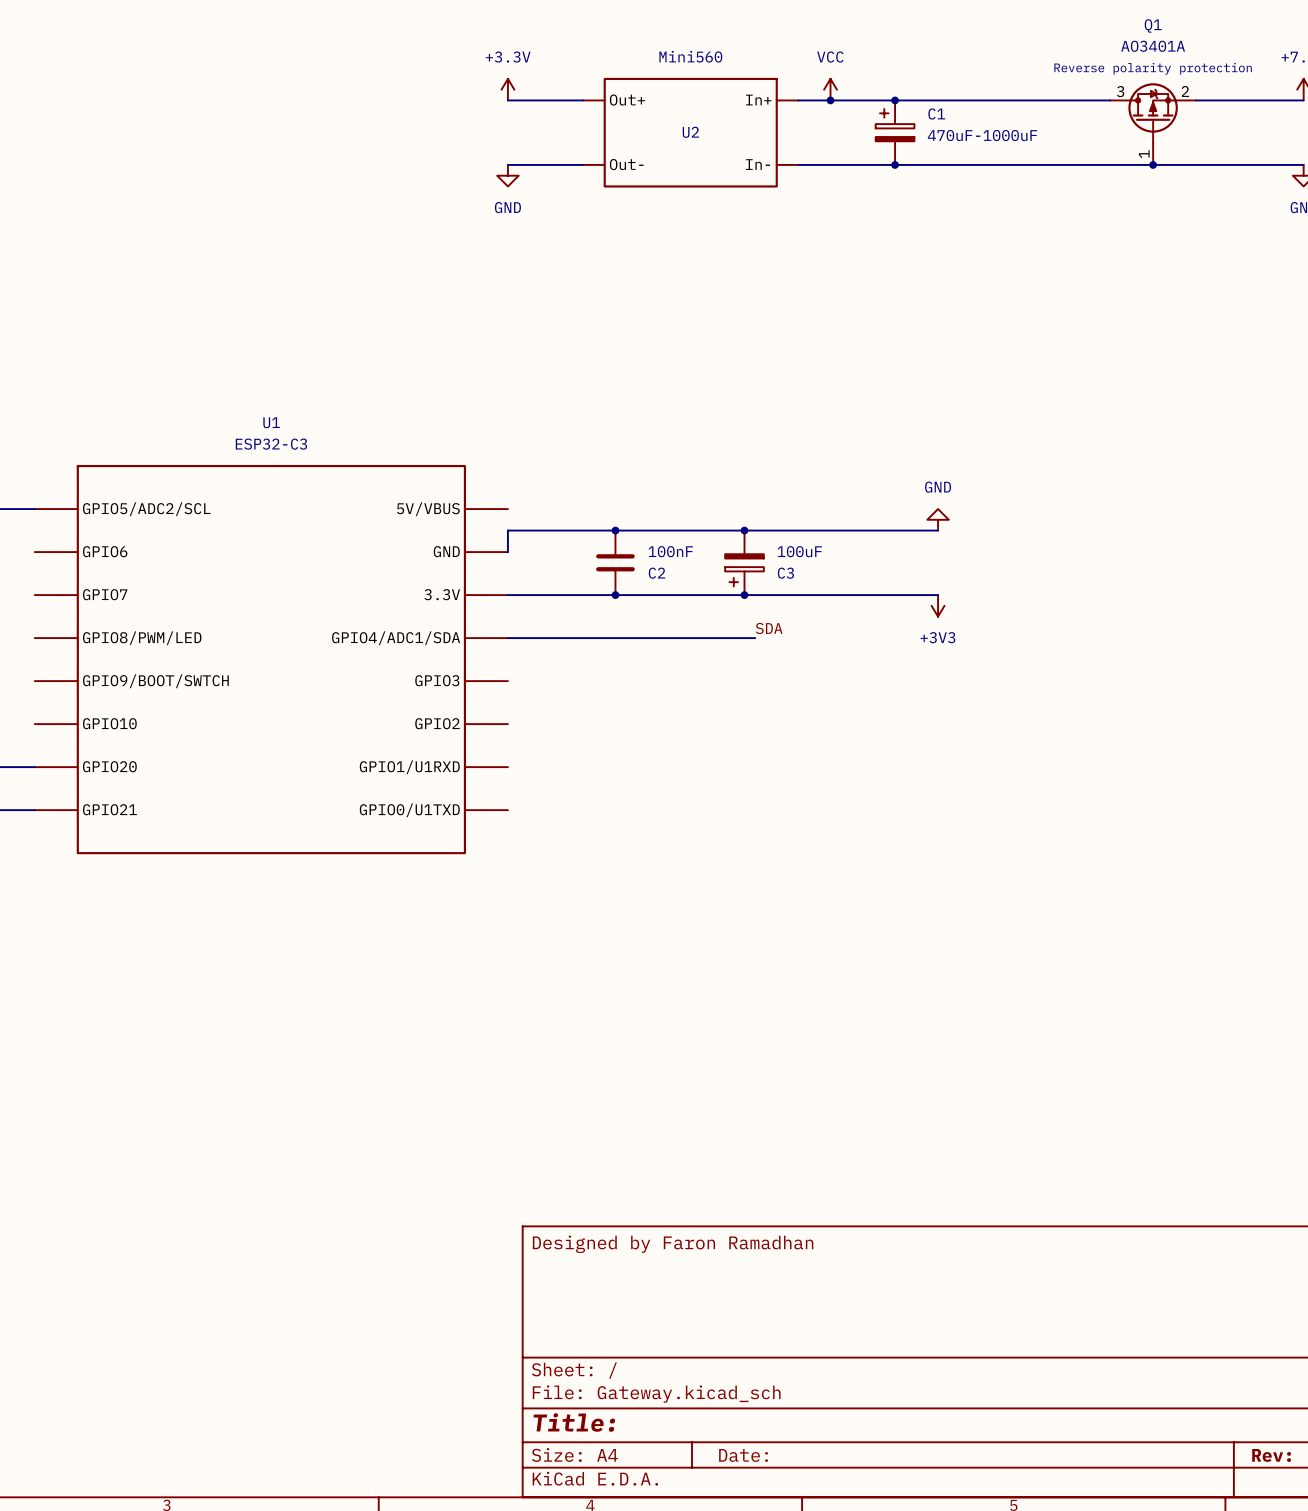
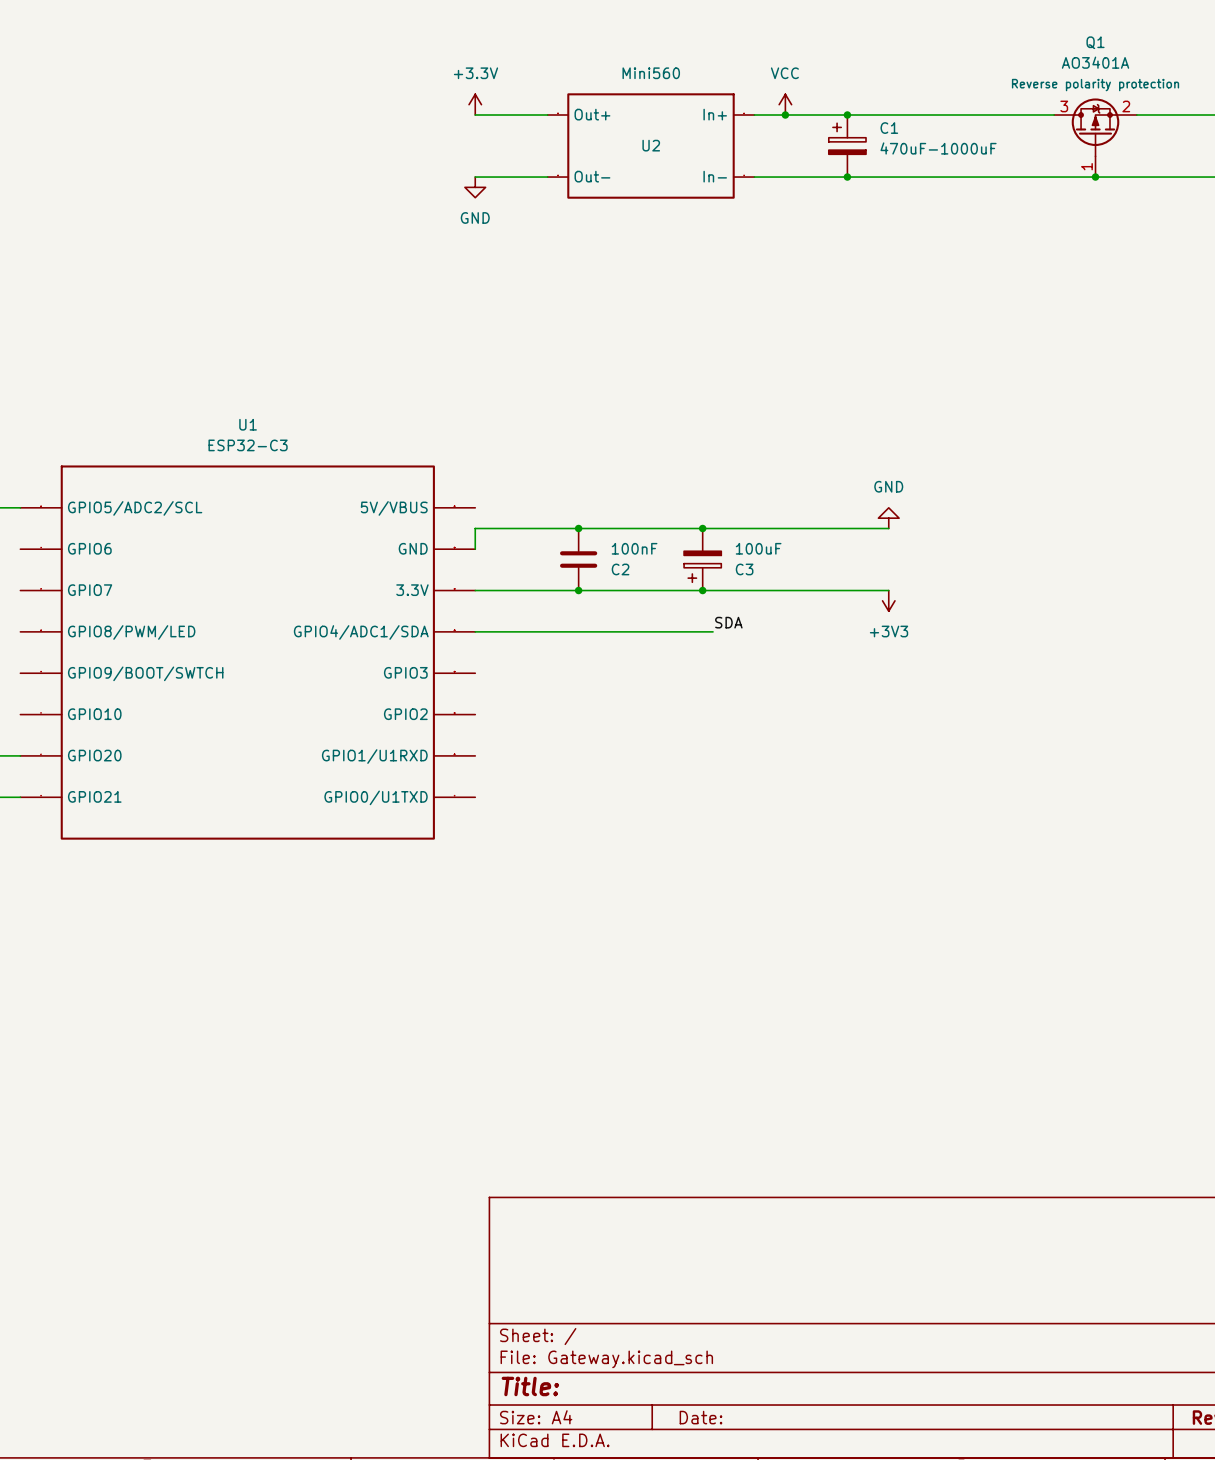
title block: Designed by Faron Ramadhan (673, 1244) -> none

